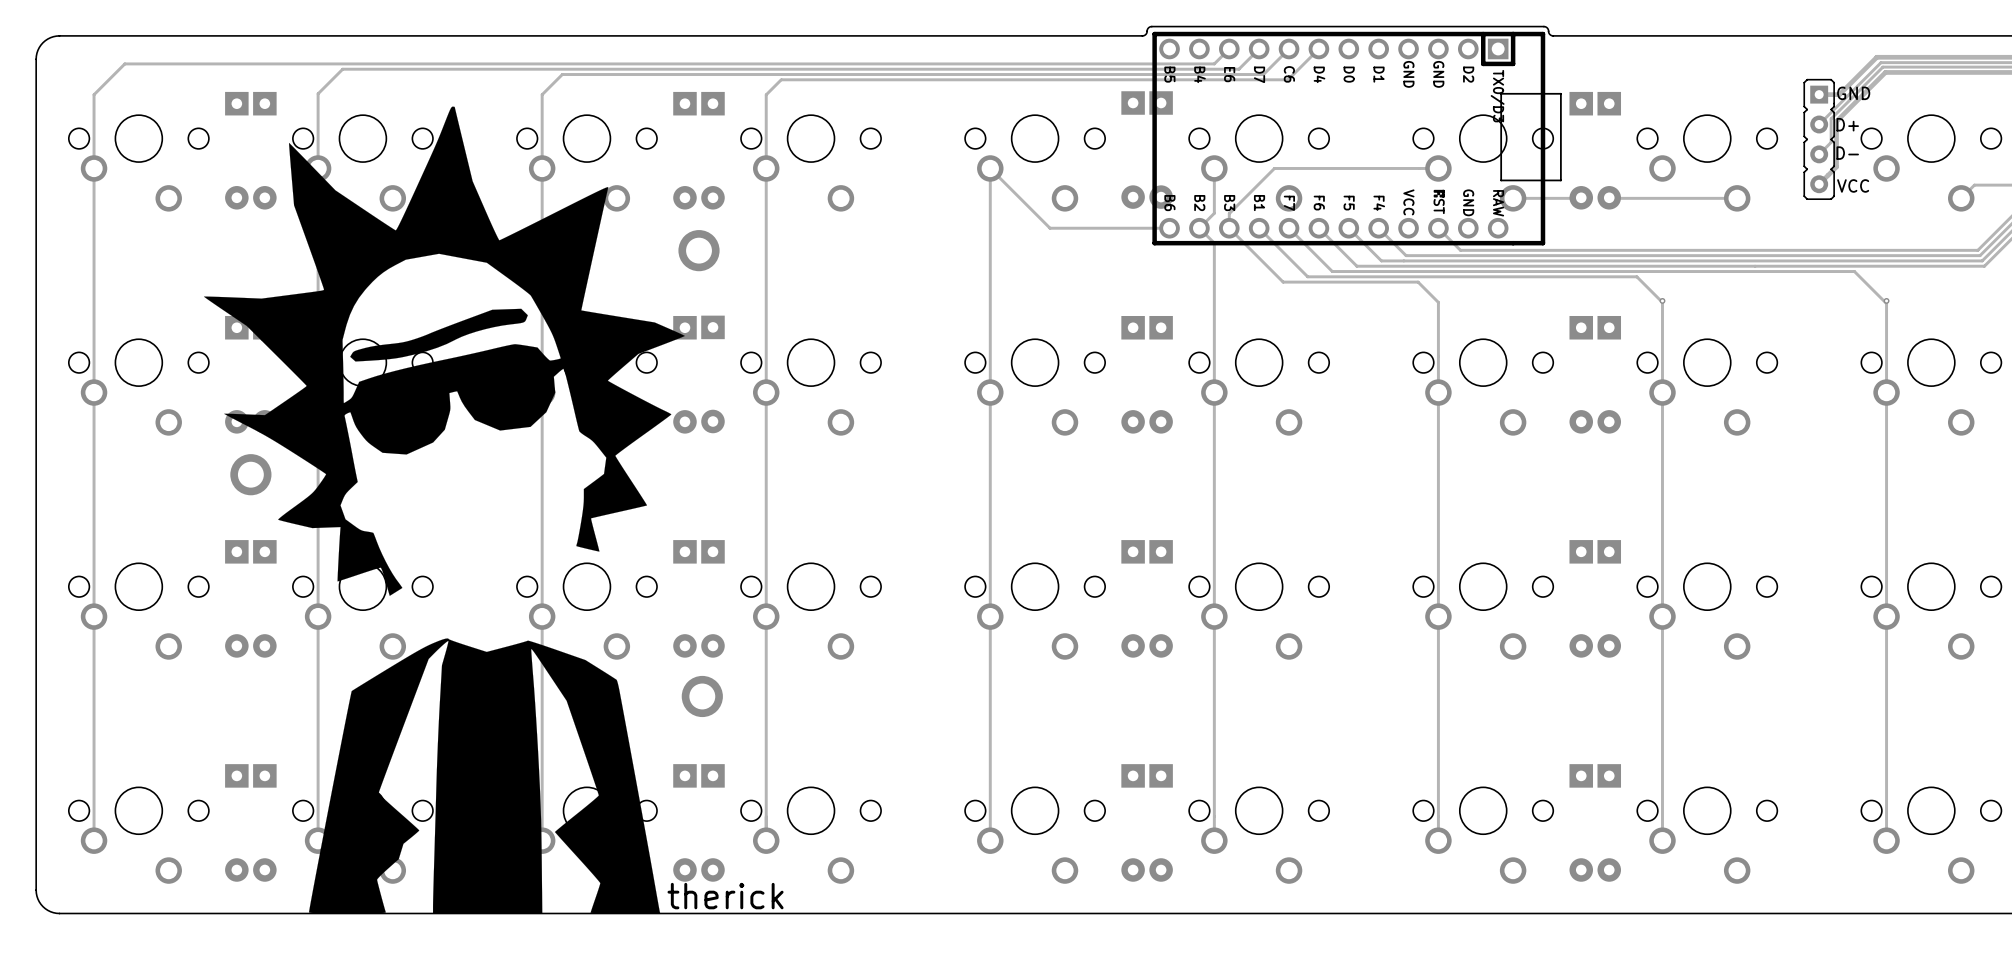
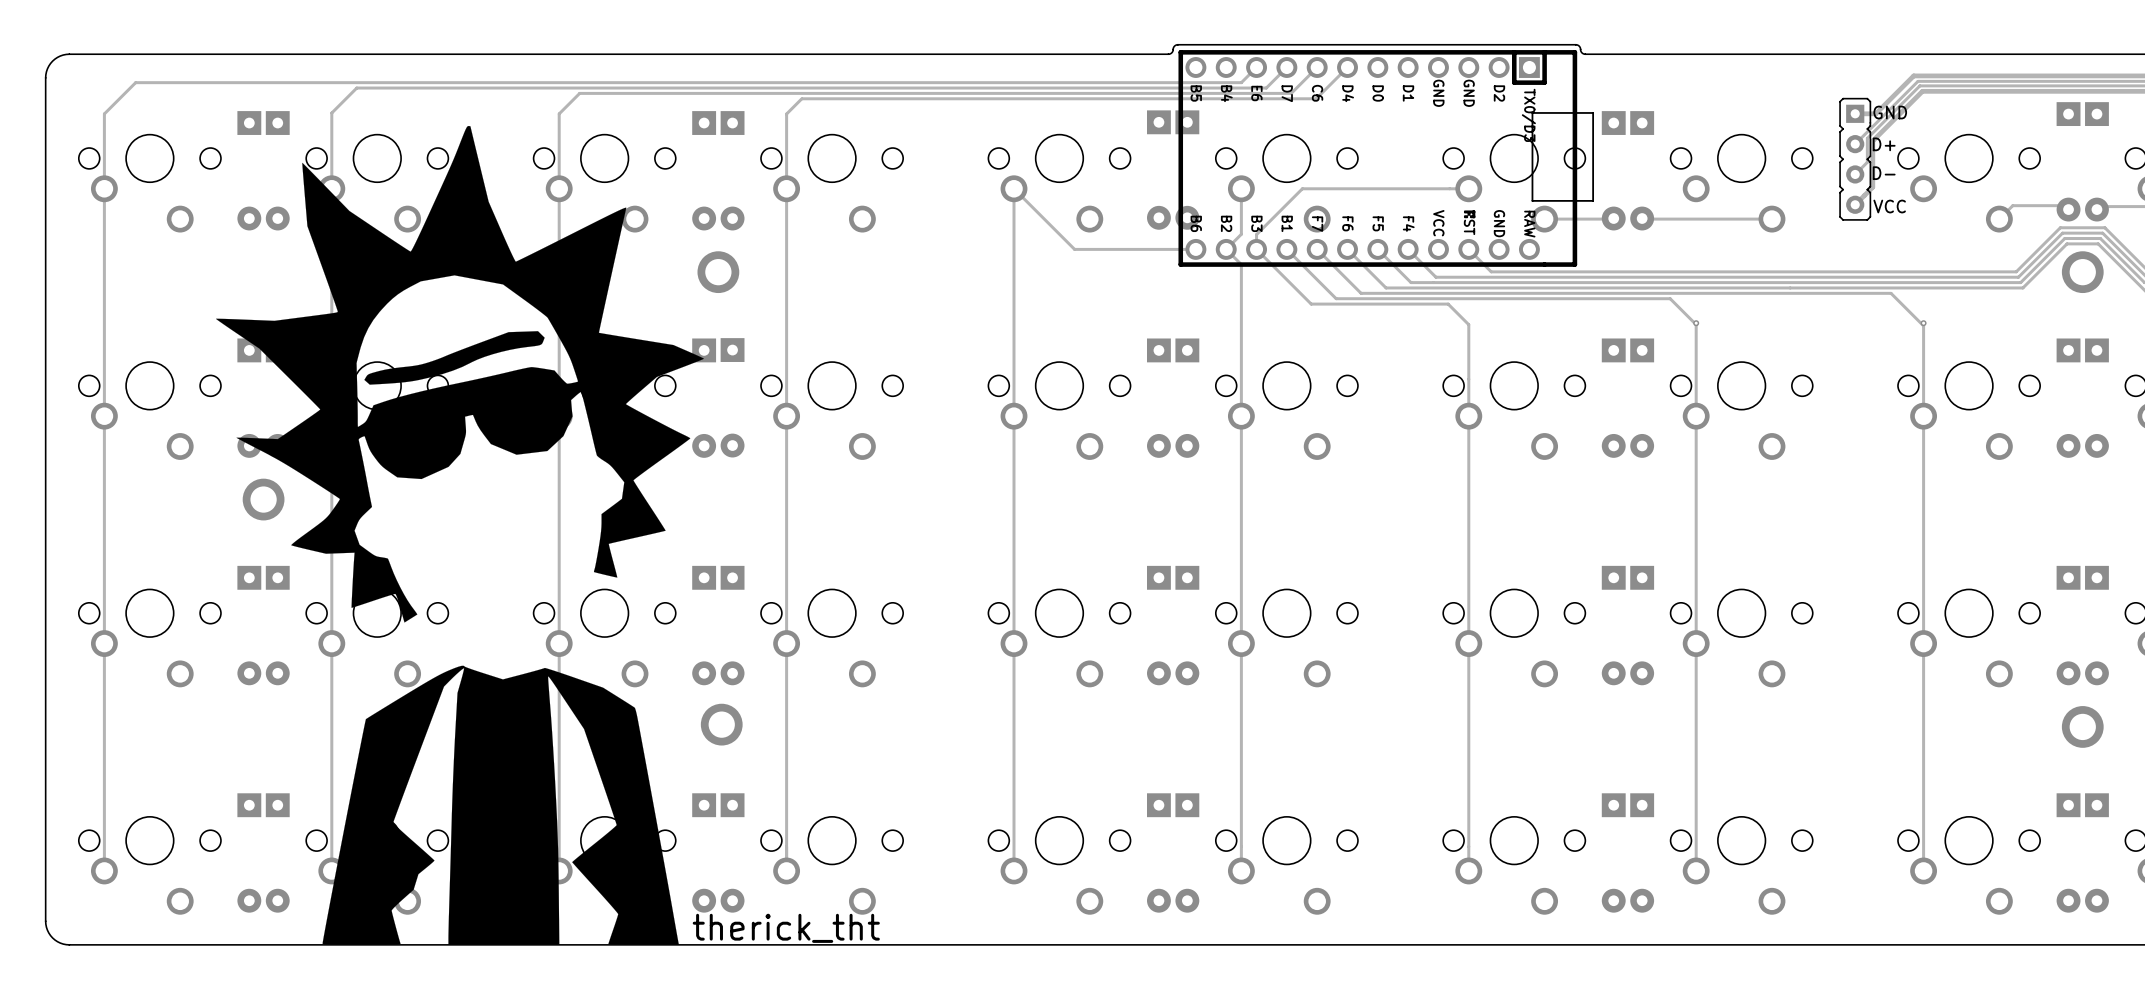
text: therick (725, 896) -> therick_tht (786, 928)

